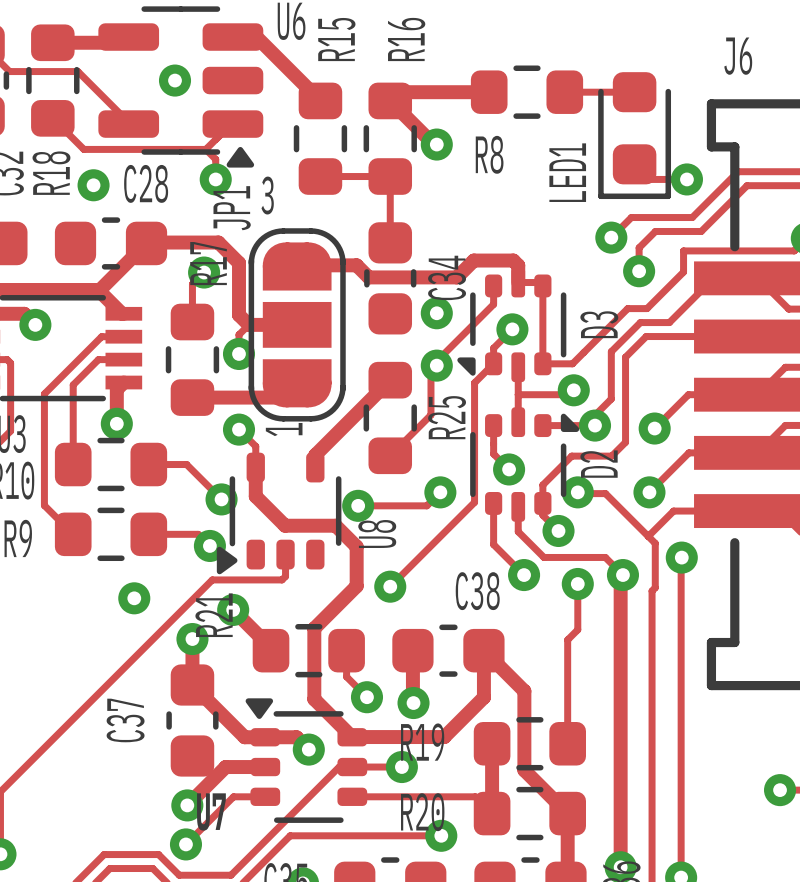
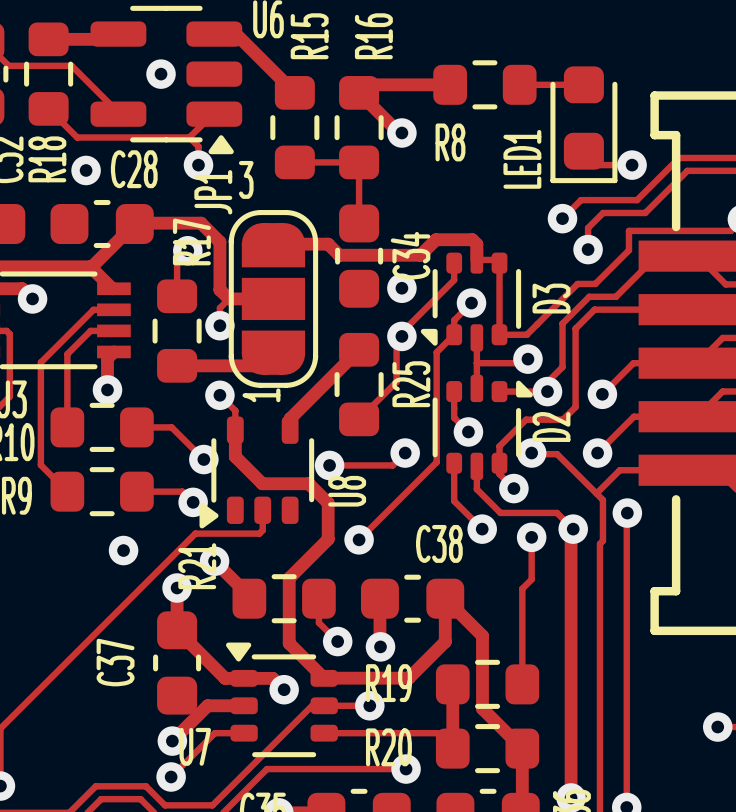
J6 name: J6 (738, 56) -> none

